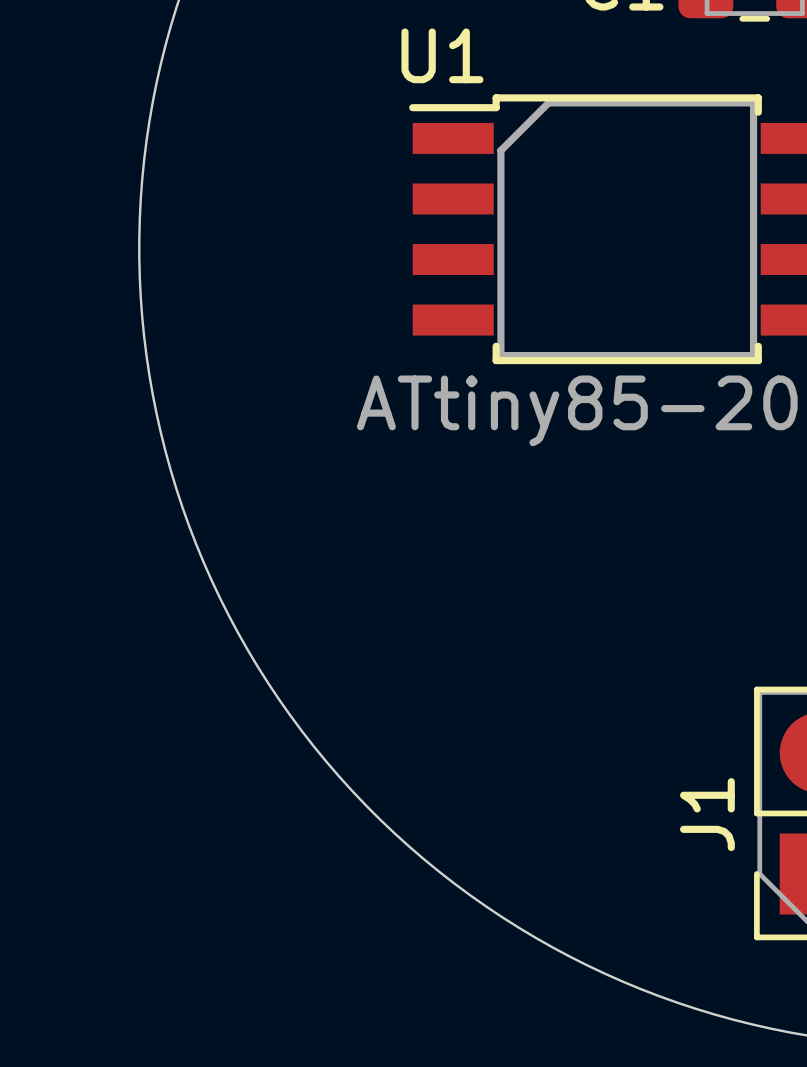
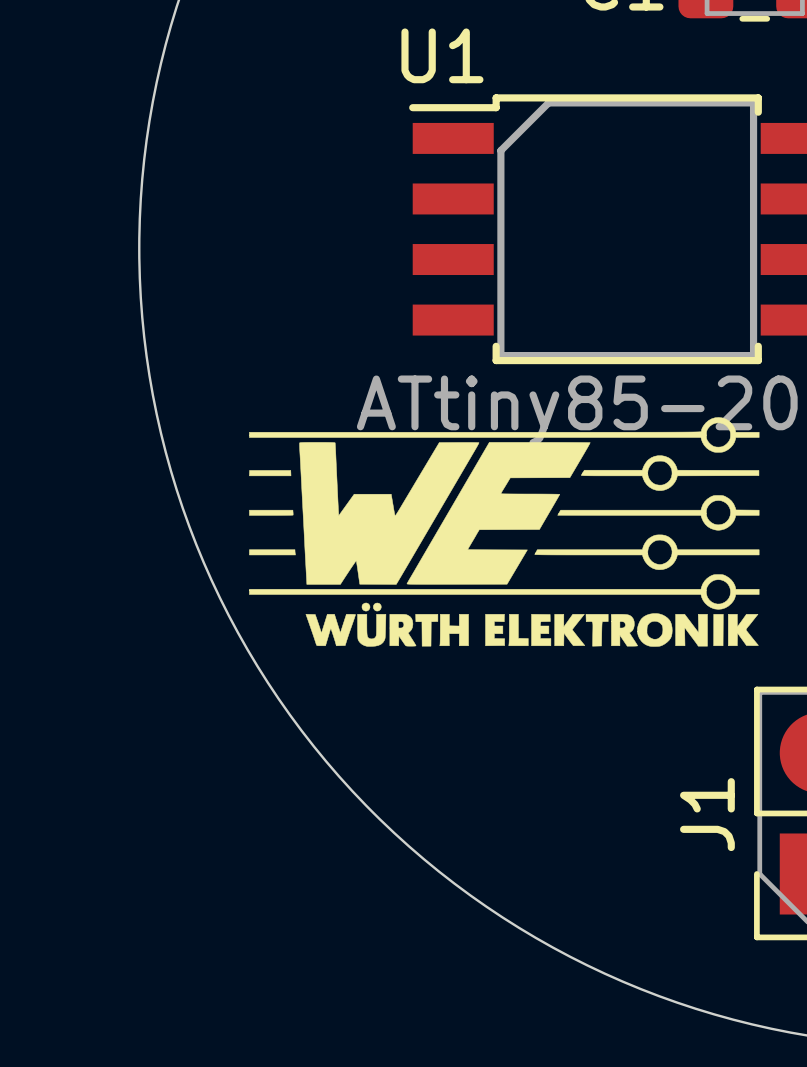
drawing: none -> [249, 417, 760, 647]

